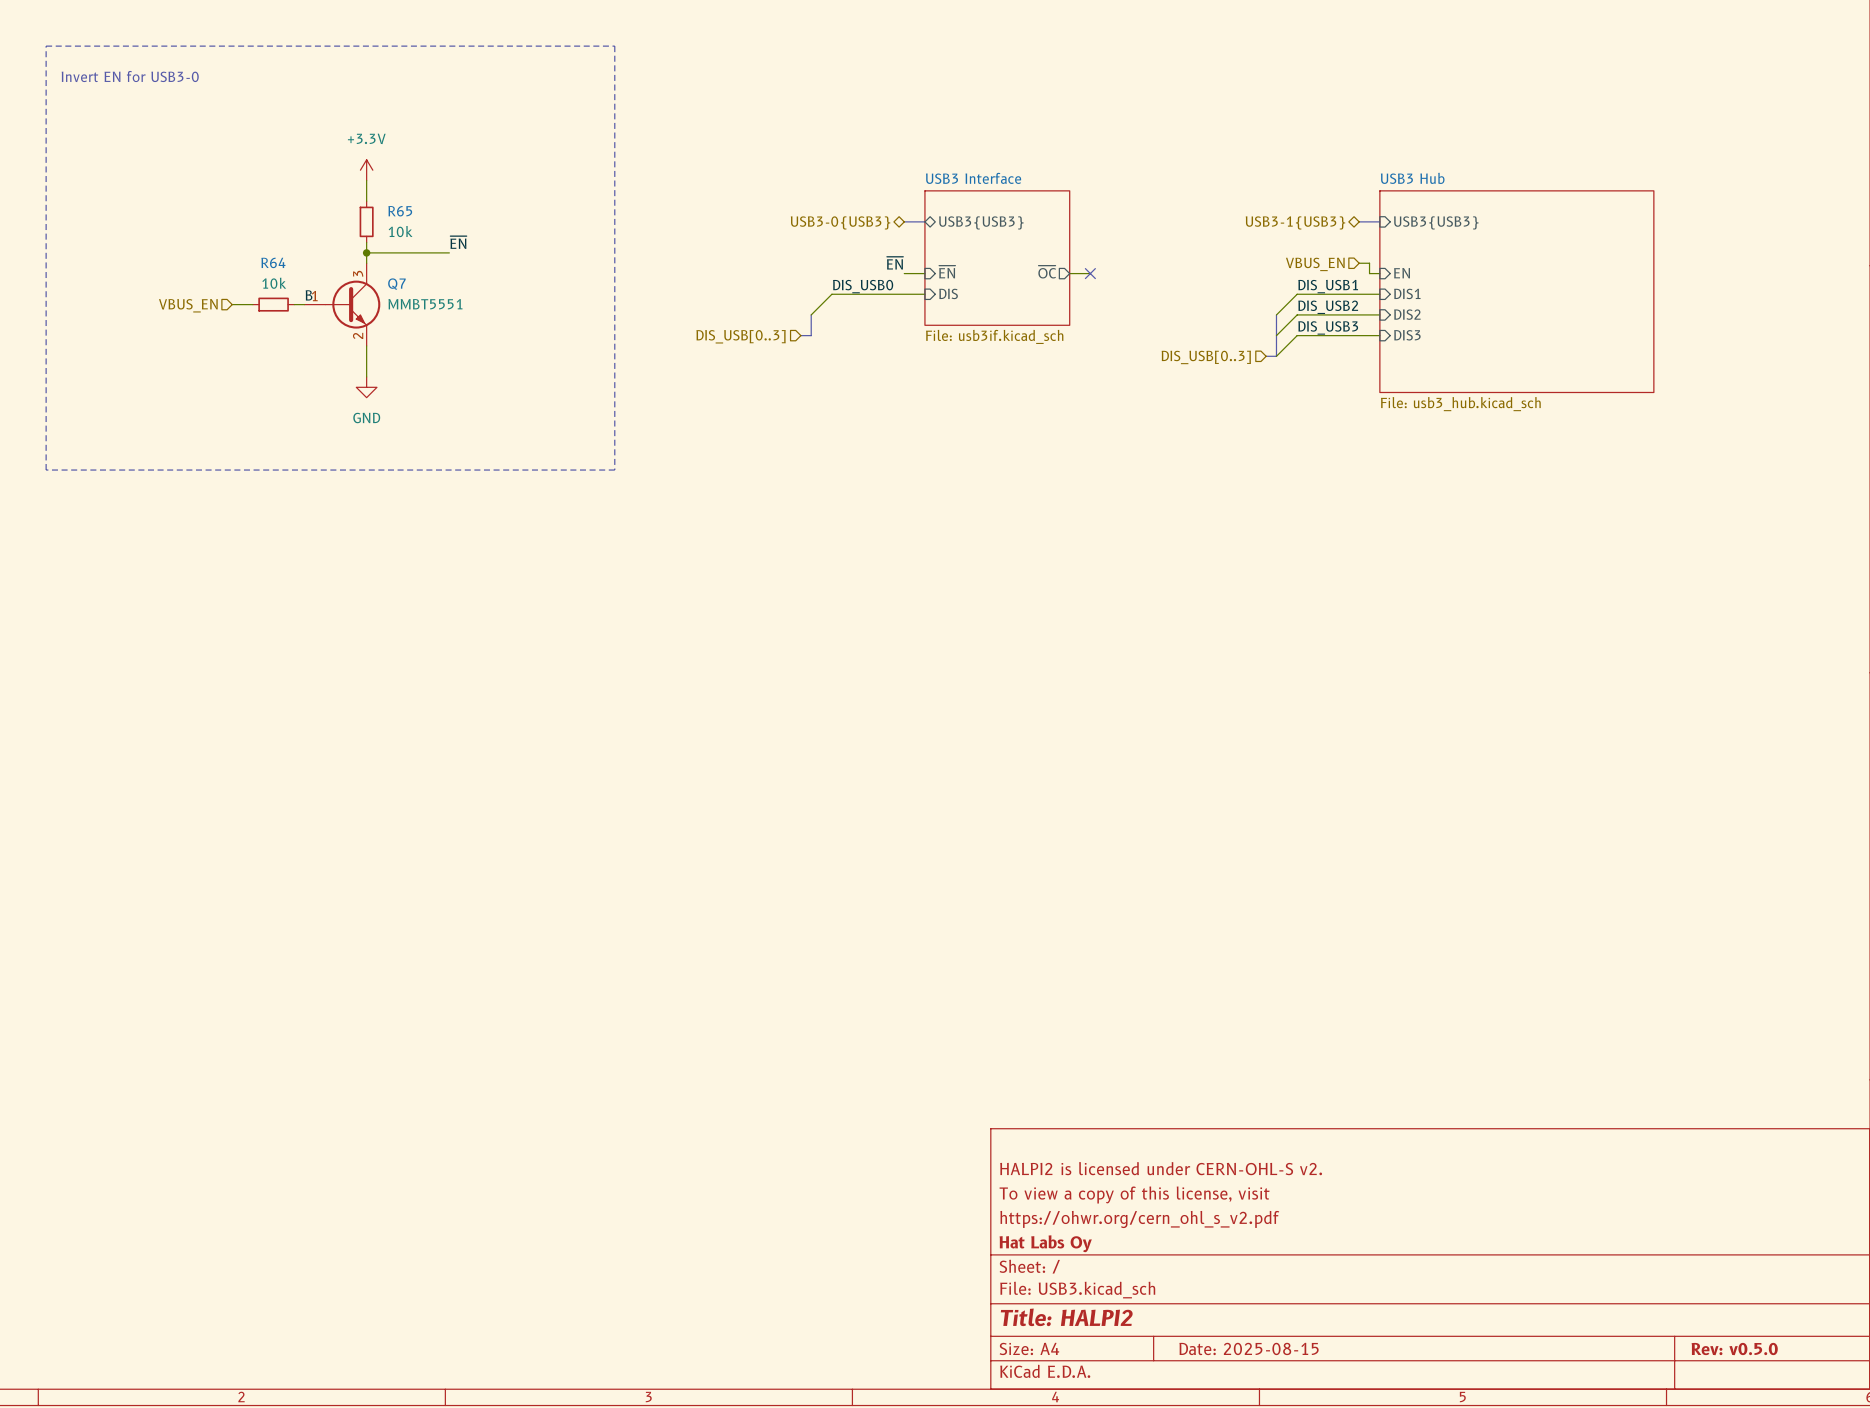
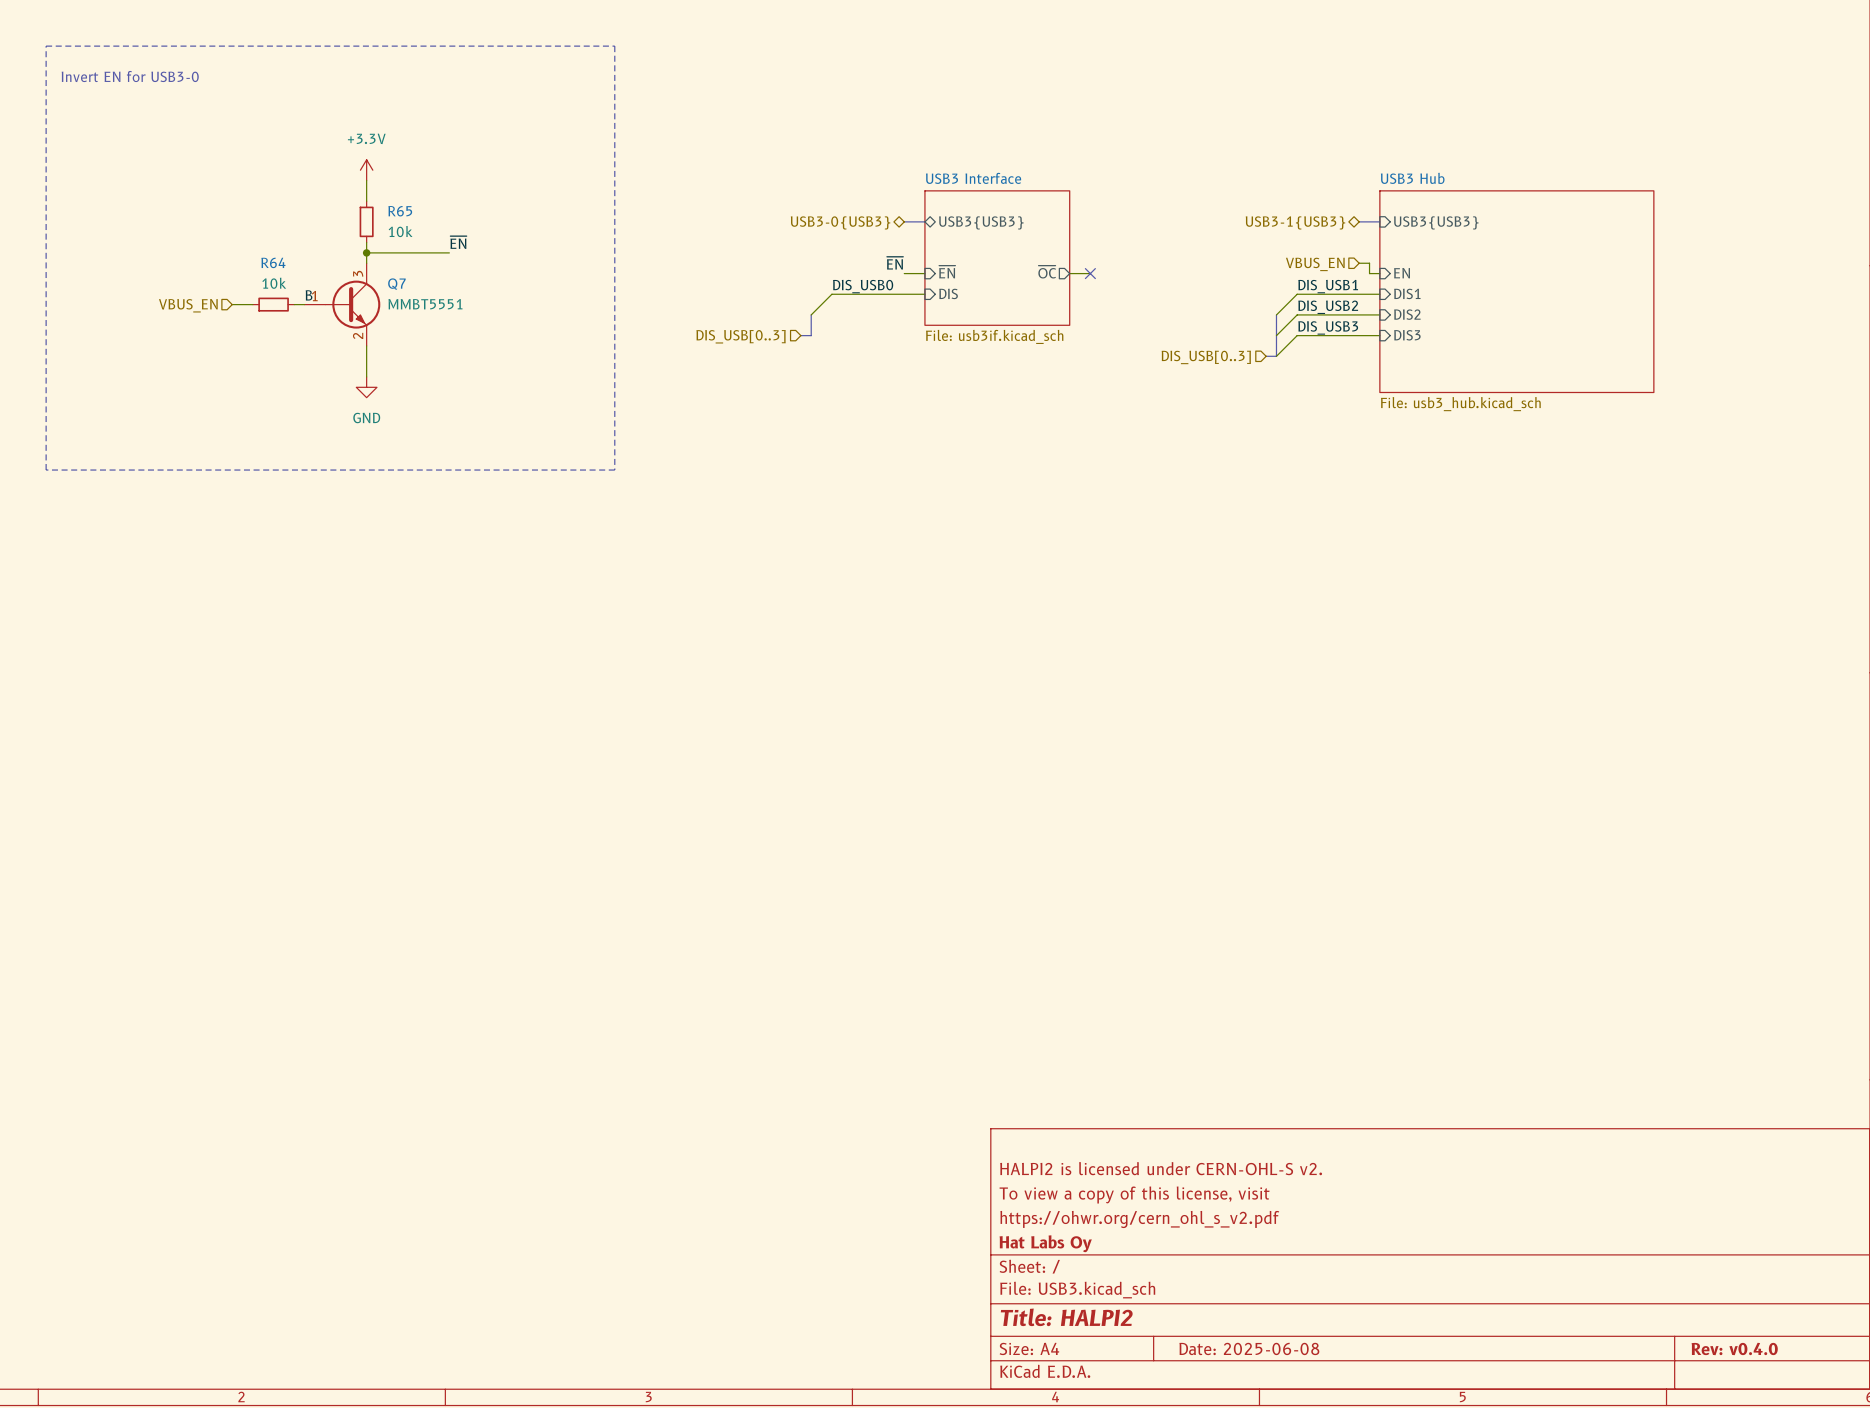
title block: Date: 2025-08-15 (1249, 1348) -> Date: 2025-06-08 (1249, 1348)
title block: Rev: v0.5.0 (1734, 1349) -> Rev: v0.4.0 (1734, 1348)

